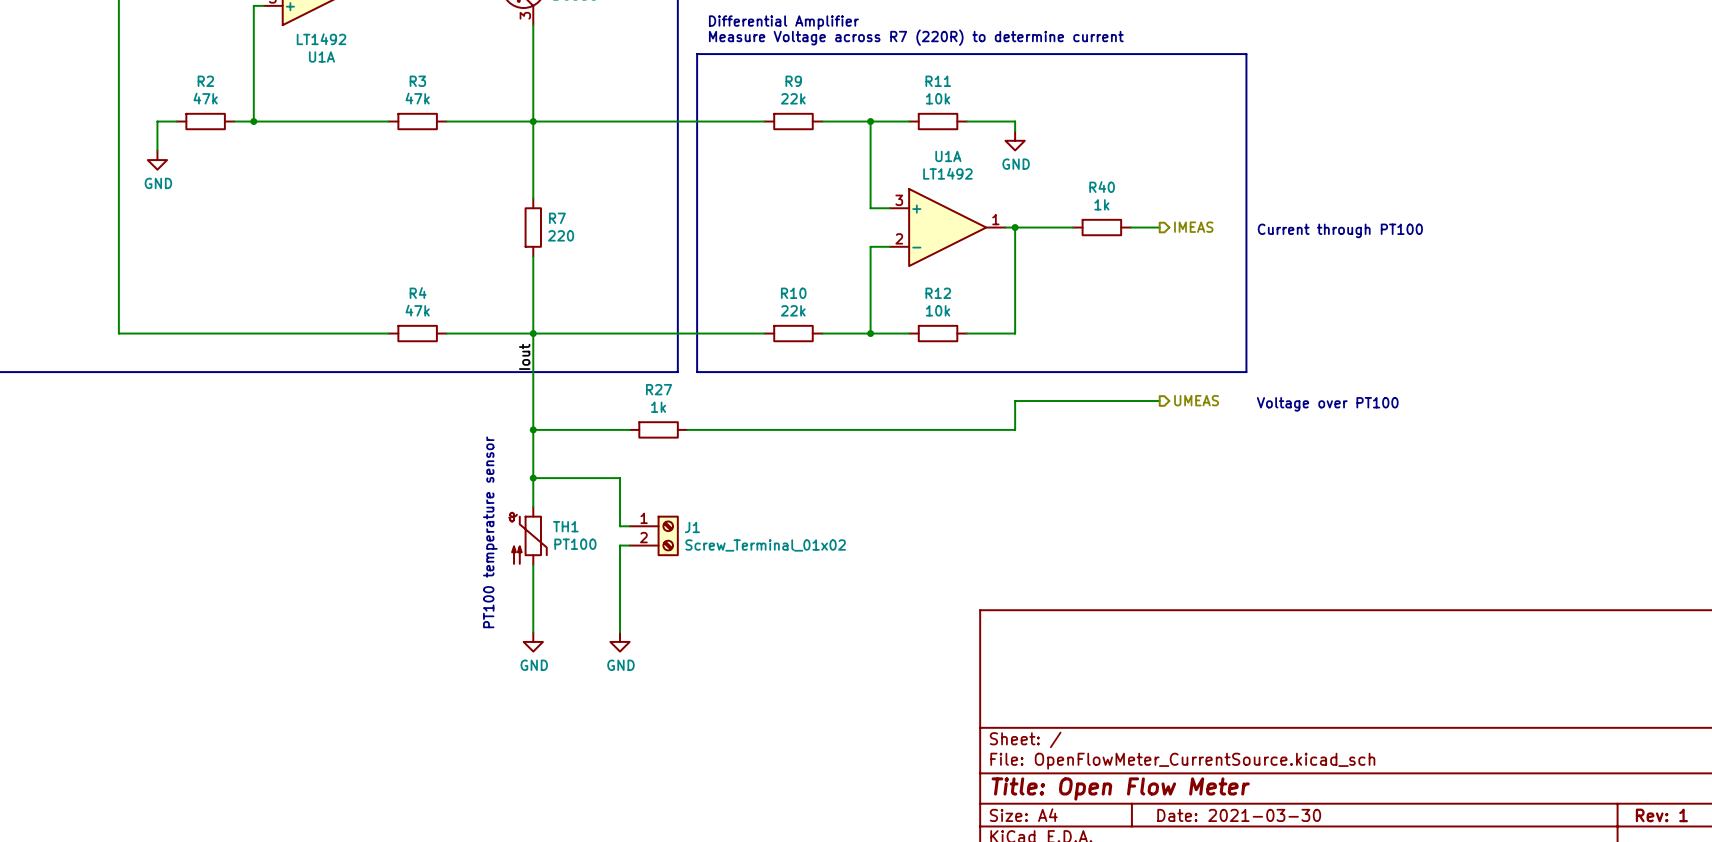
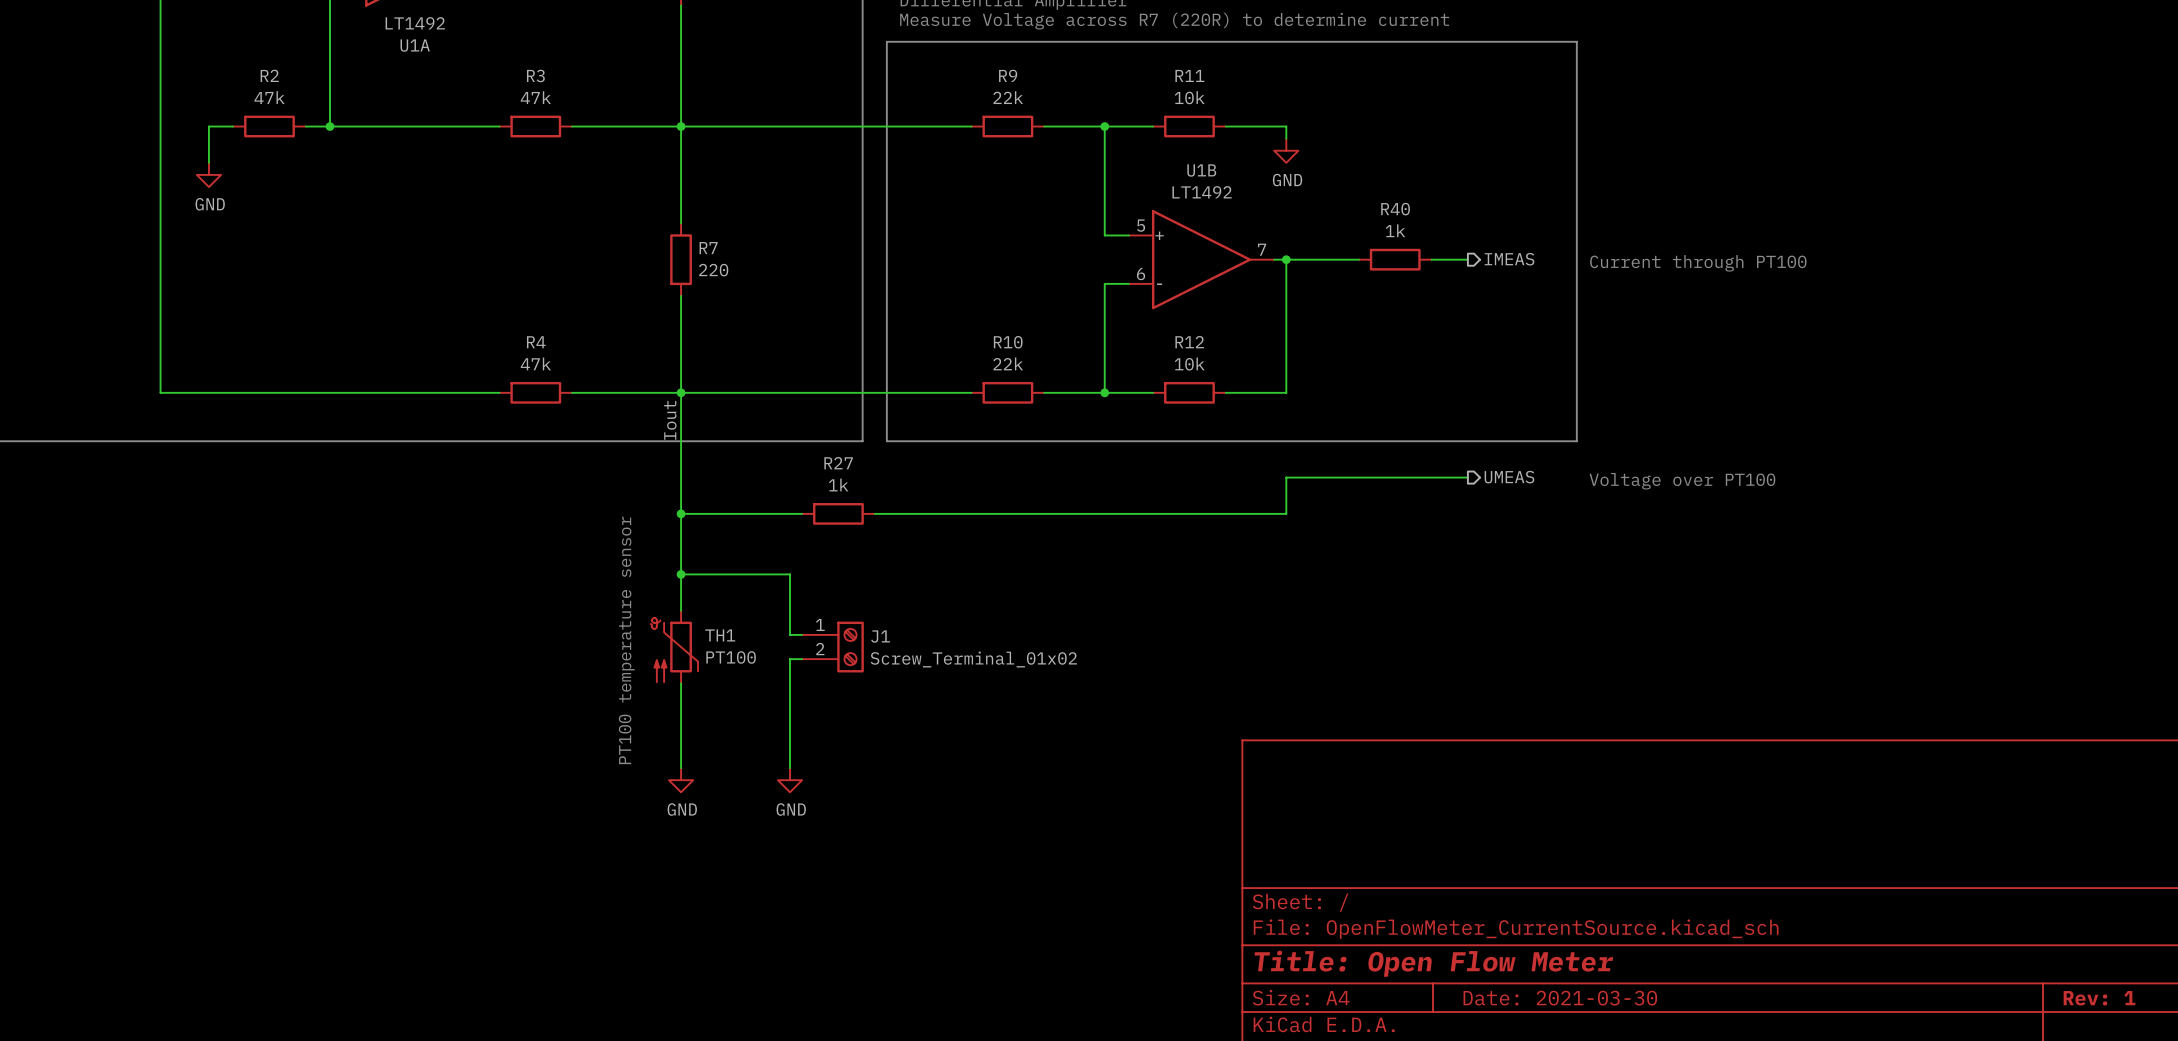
U1A name: U1A (948, 156) -> U1B (1201, 170)
U1A pin number: 3 (899, 200) -> 5 (1141, 225)
U1A pin number: 1 (995, 219) -> 7 (1262, 249)
U1A pin number: 2 (899, 238) -> 6 (1141, 274)

